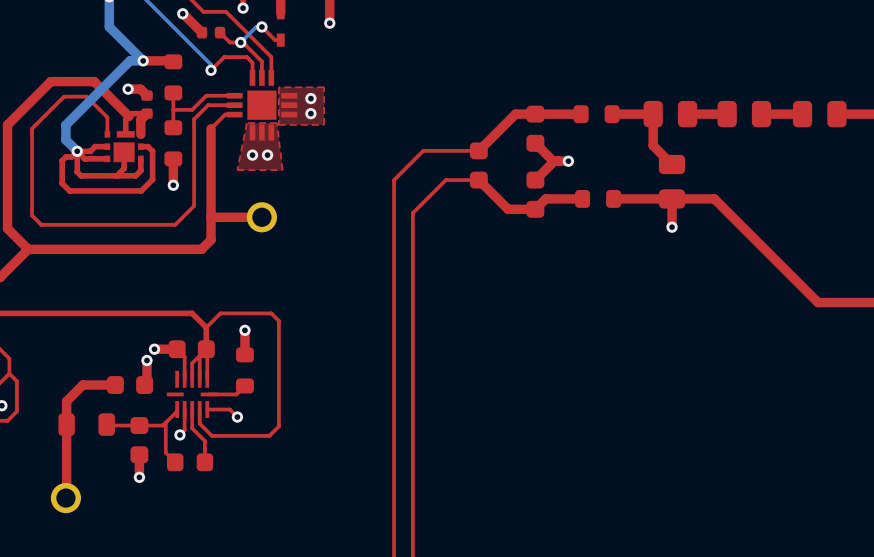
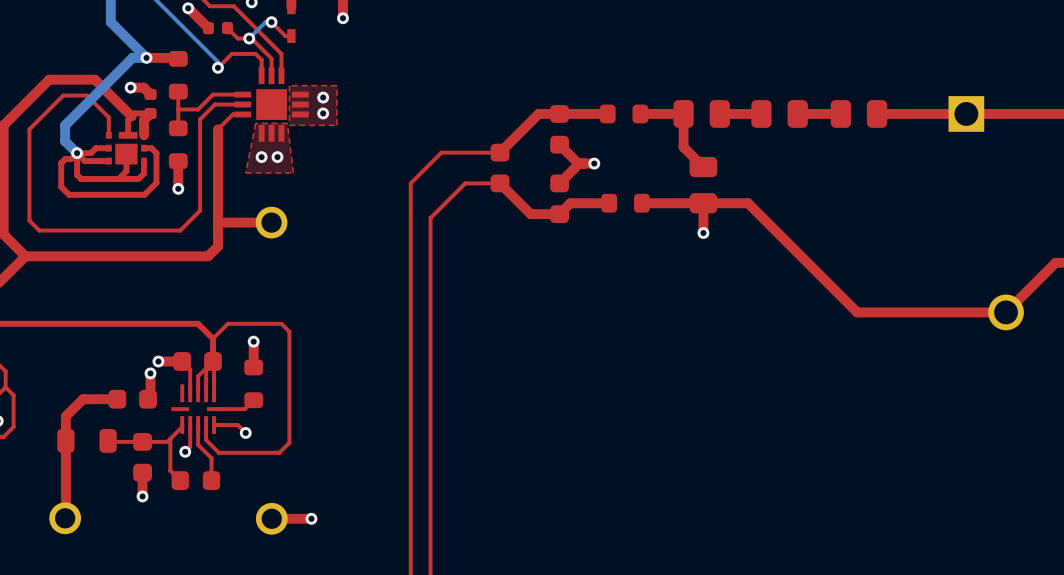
part: none -> (271, 518)
top track: none -> (311, 518) (271, 518)
via: none -> (311, 518)

